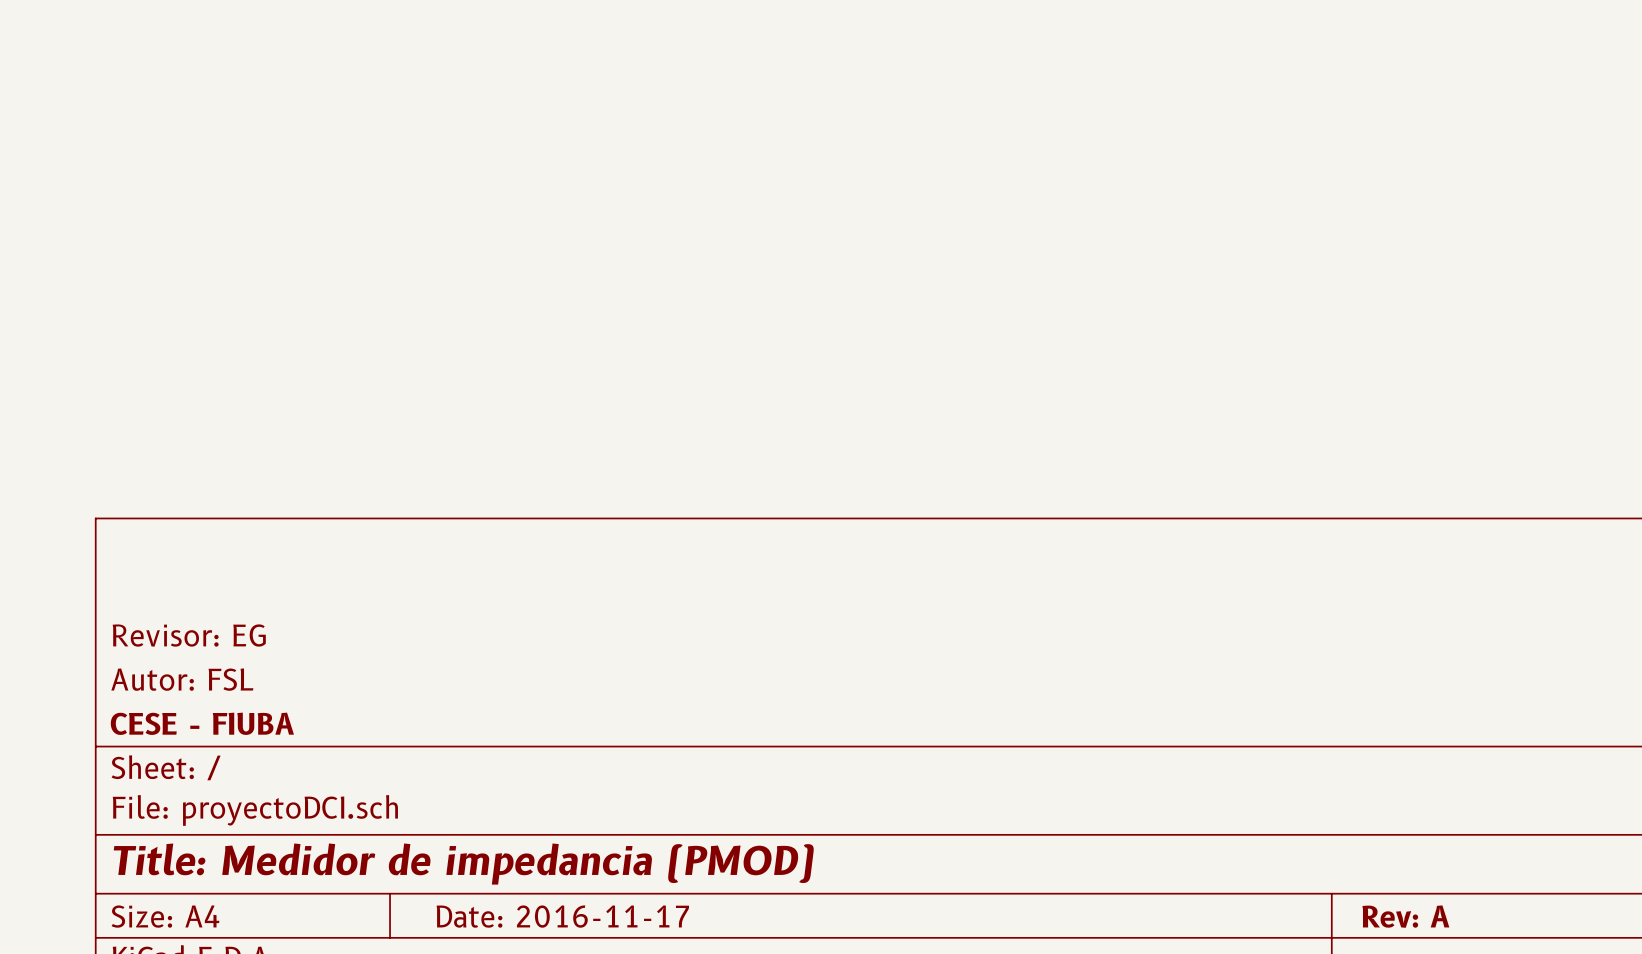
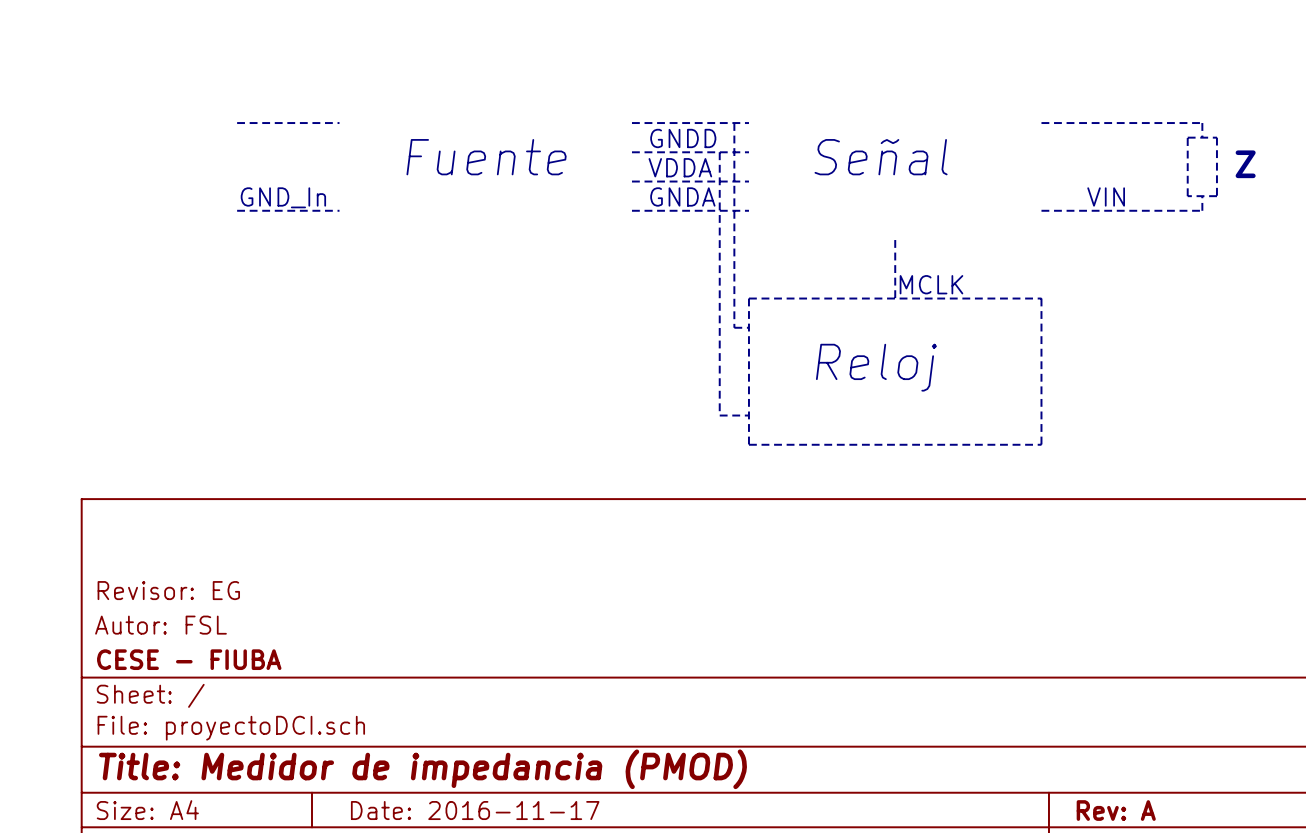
line: none -> (237, 123) (339, 123)
line: none -> (631, 123) (748, 123)
line: none -> (734, 123) (734, 327) (748, 327)
line: none -> (1041, 123) (1202, 123) (1202, 137)
line: none -> (1187, 137) (1216, 137) (1216, 196) (1187, 196) (1187, 137)
text: none -> GNDD (683, 138)
line: none -> (631, 152) (748, 152)
line: none -> (719, 152) (719, 415) (748, 415)
text: none -> Señal (881, 157)
text: none -> Fuente (486, 157)
text: none -> Z (1245, 164)
text: none -> VDDA (680, 167)
line: none -> (631, 181) (748, 181)
line: none -> (1202, 196) (1202, 210) (1041, 210)
text: none -> GNDA (682, 196)
text: none -> VIN (1106, 196)
text: none -> GND_In (283, 197)
line: none -> (237, 210) (339, 210)
line: none -> (631, 210) (748, 210)
line: none -> (895, 240) (895, 298)
text: none -> MCLK (931, 284)
line: none -> (748, 298) (748, 444) (1041, 444) (1041, 298) (748, 298)
text: none -> Reloj (876, 367)

